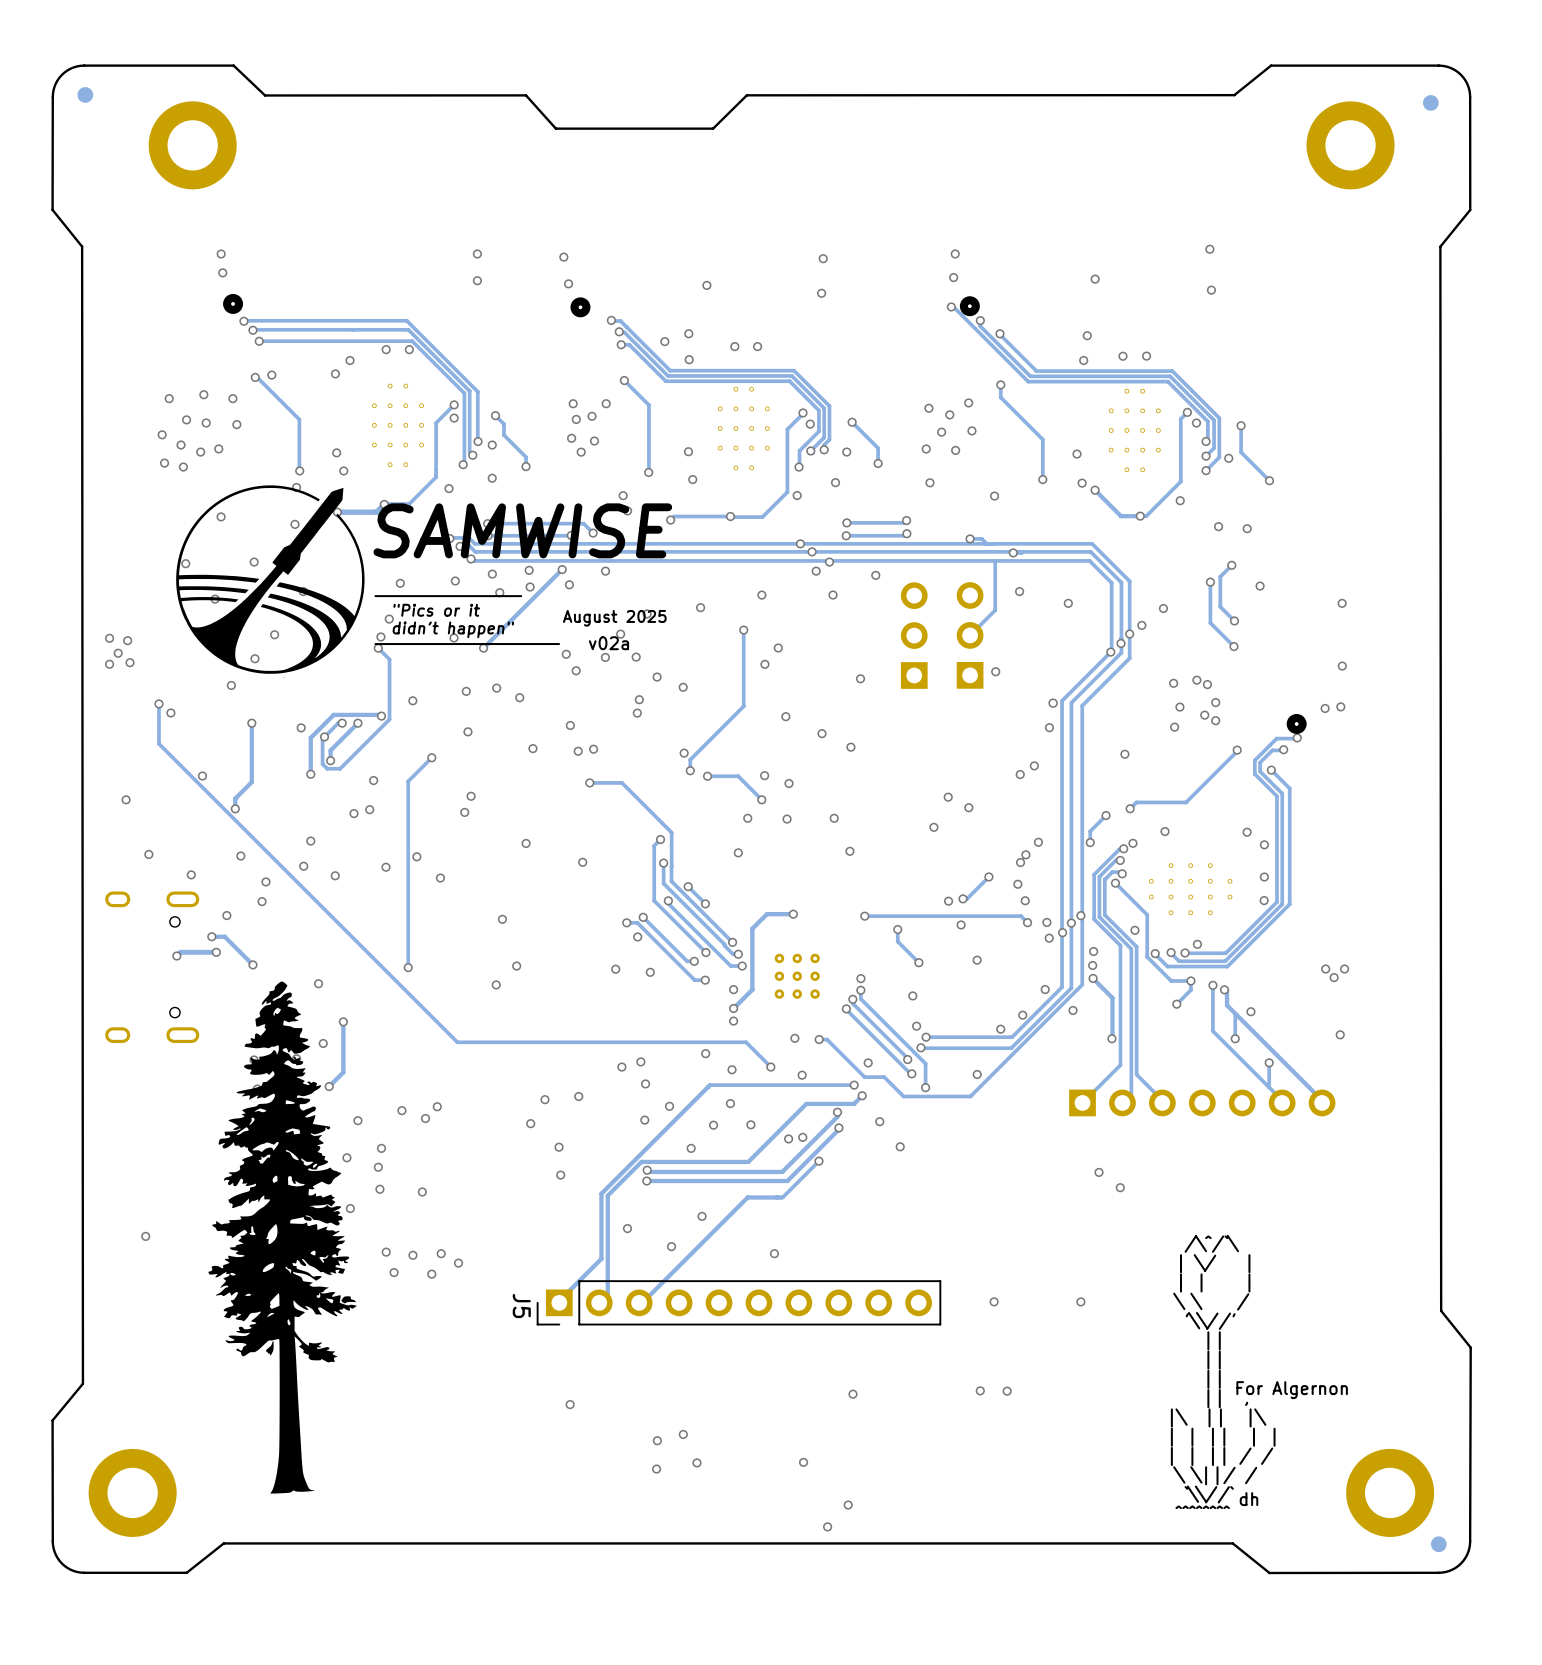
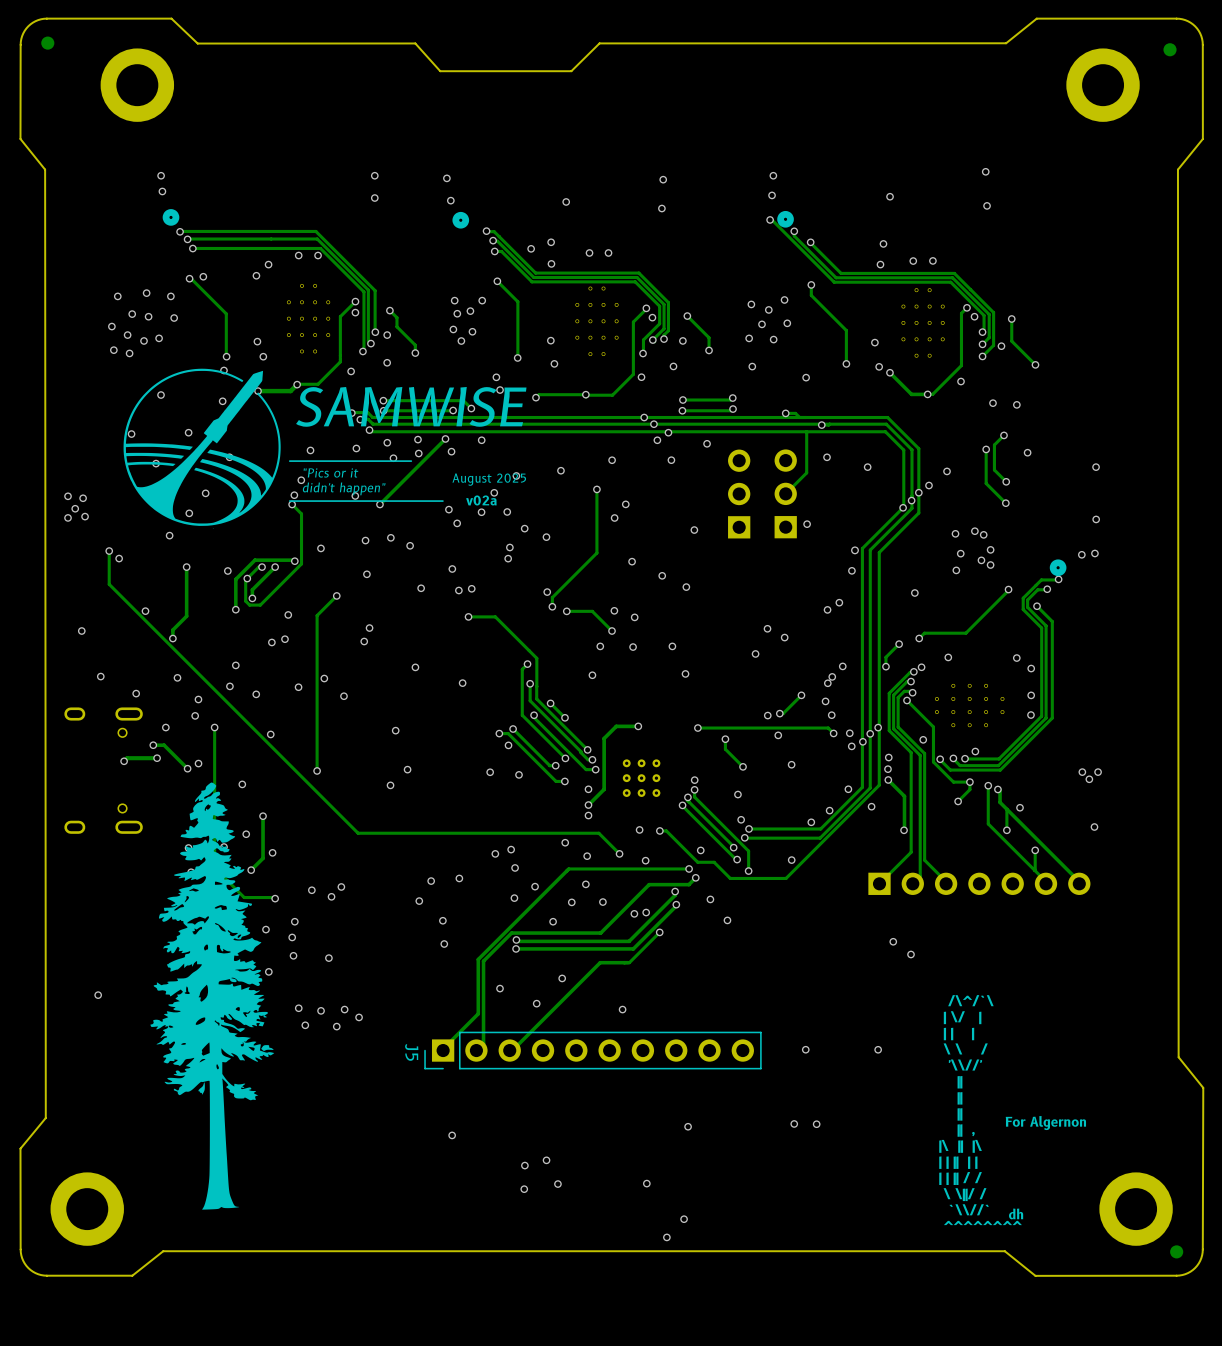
track: none -> (214, 727) (214, 867) (244, 897) (275, 898)
via: none -> (214, 727)
via: none -> (270, 734)
via: none -> (198, 763)
via: none -> (272, 852)

